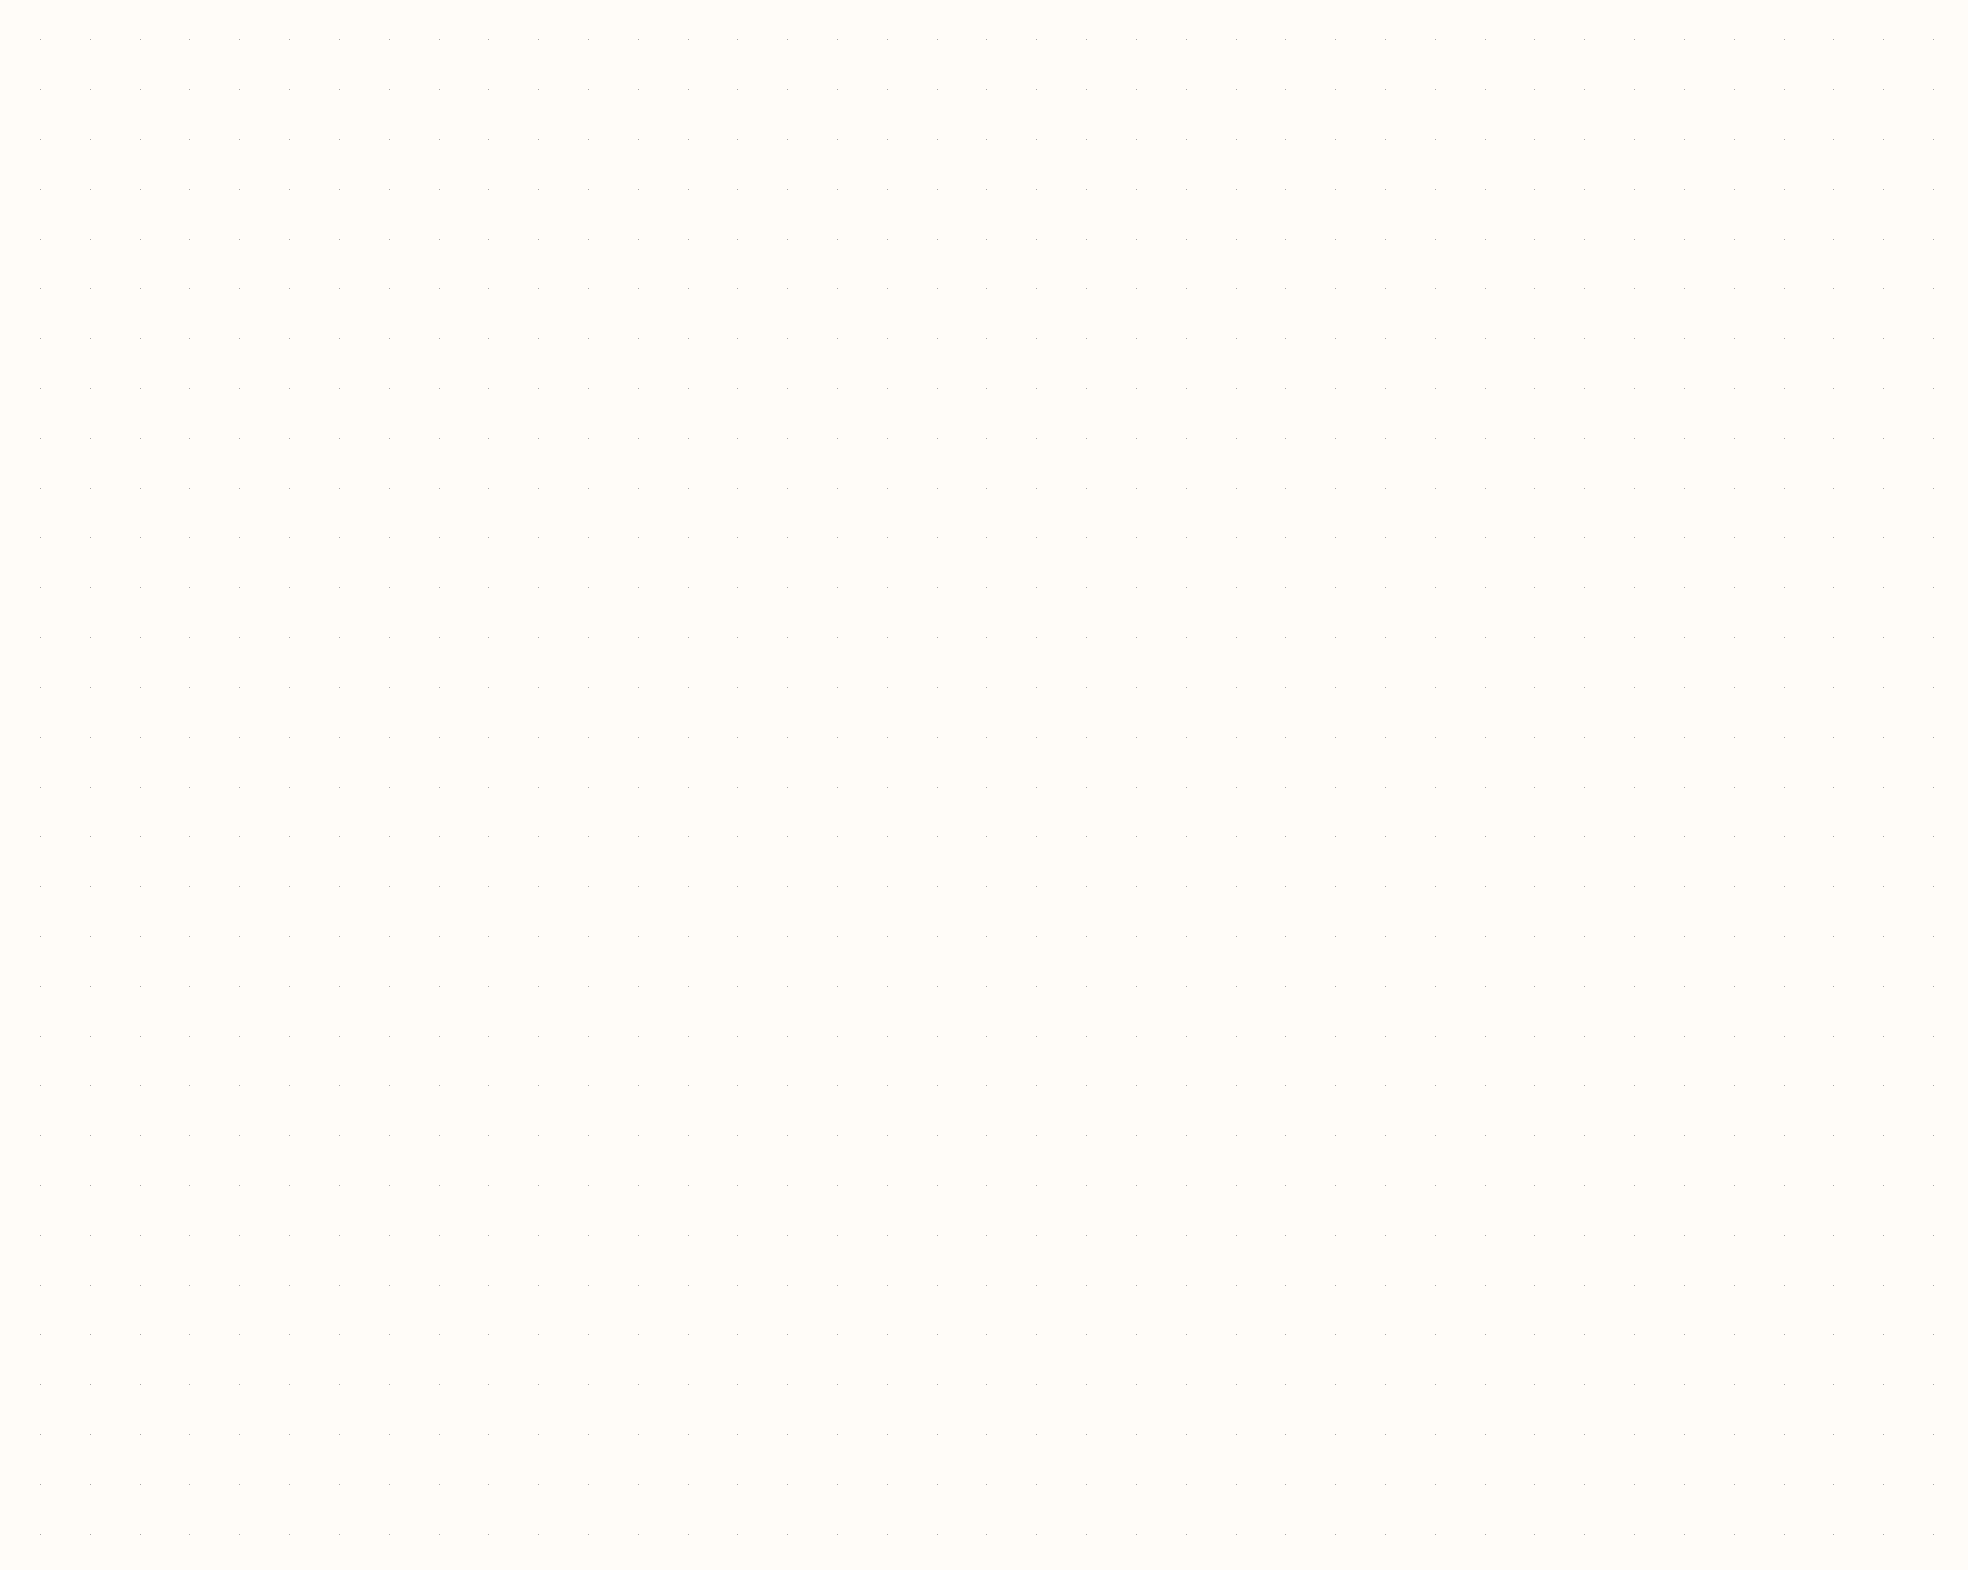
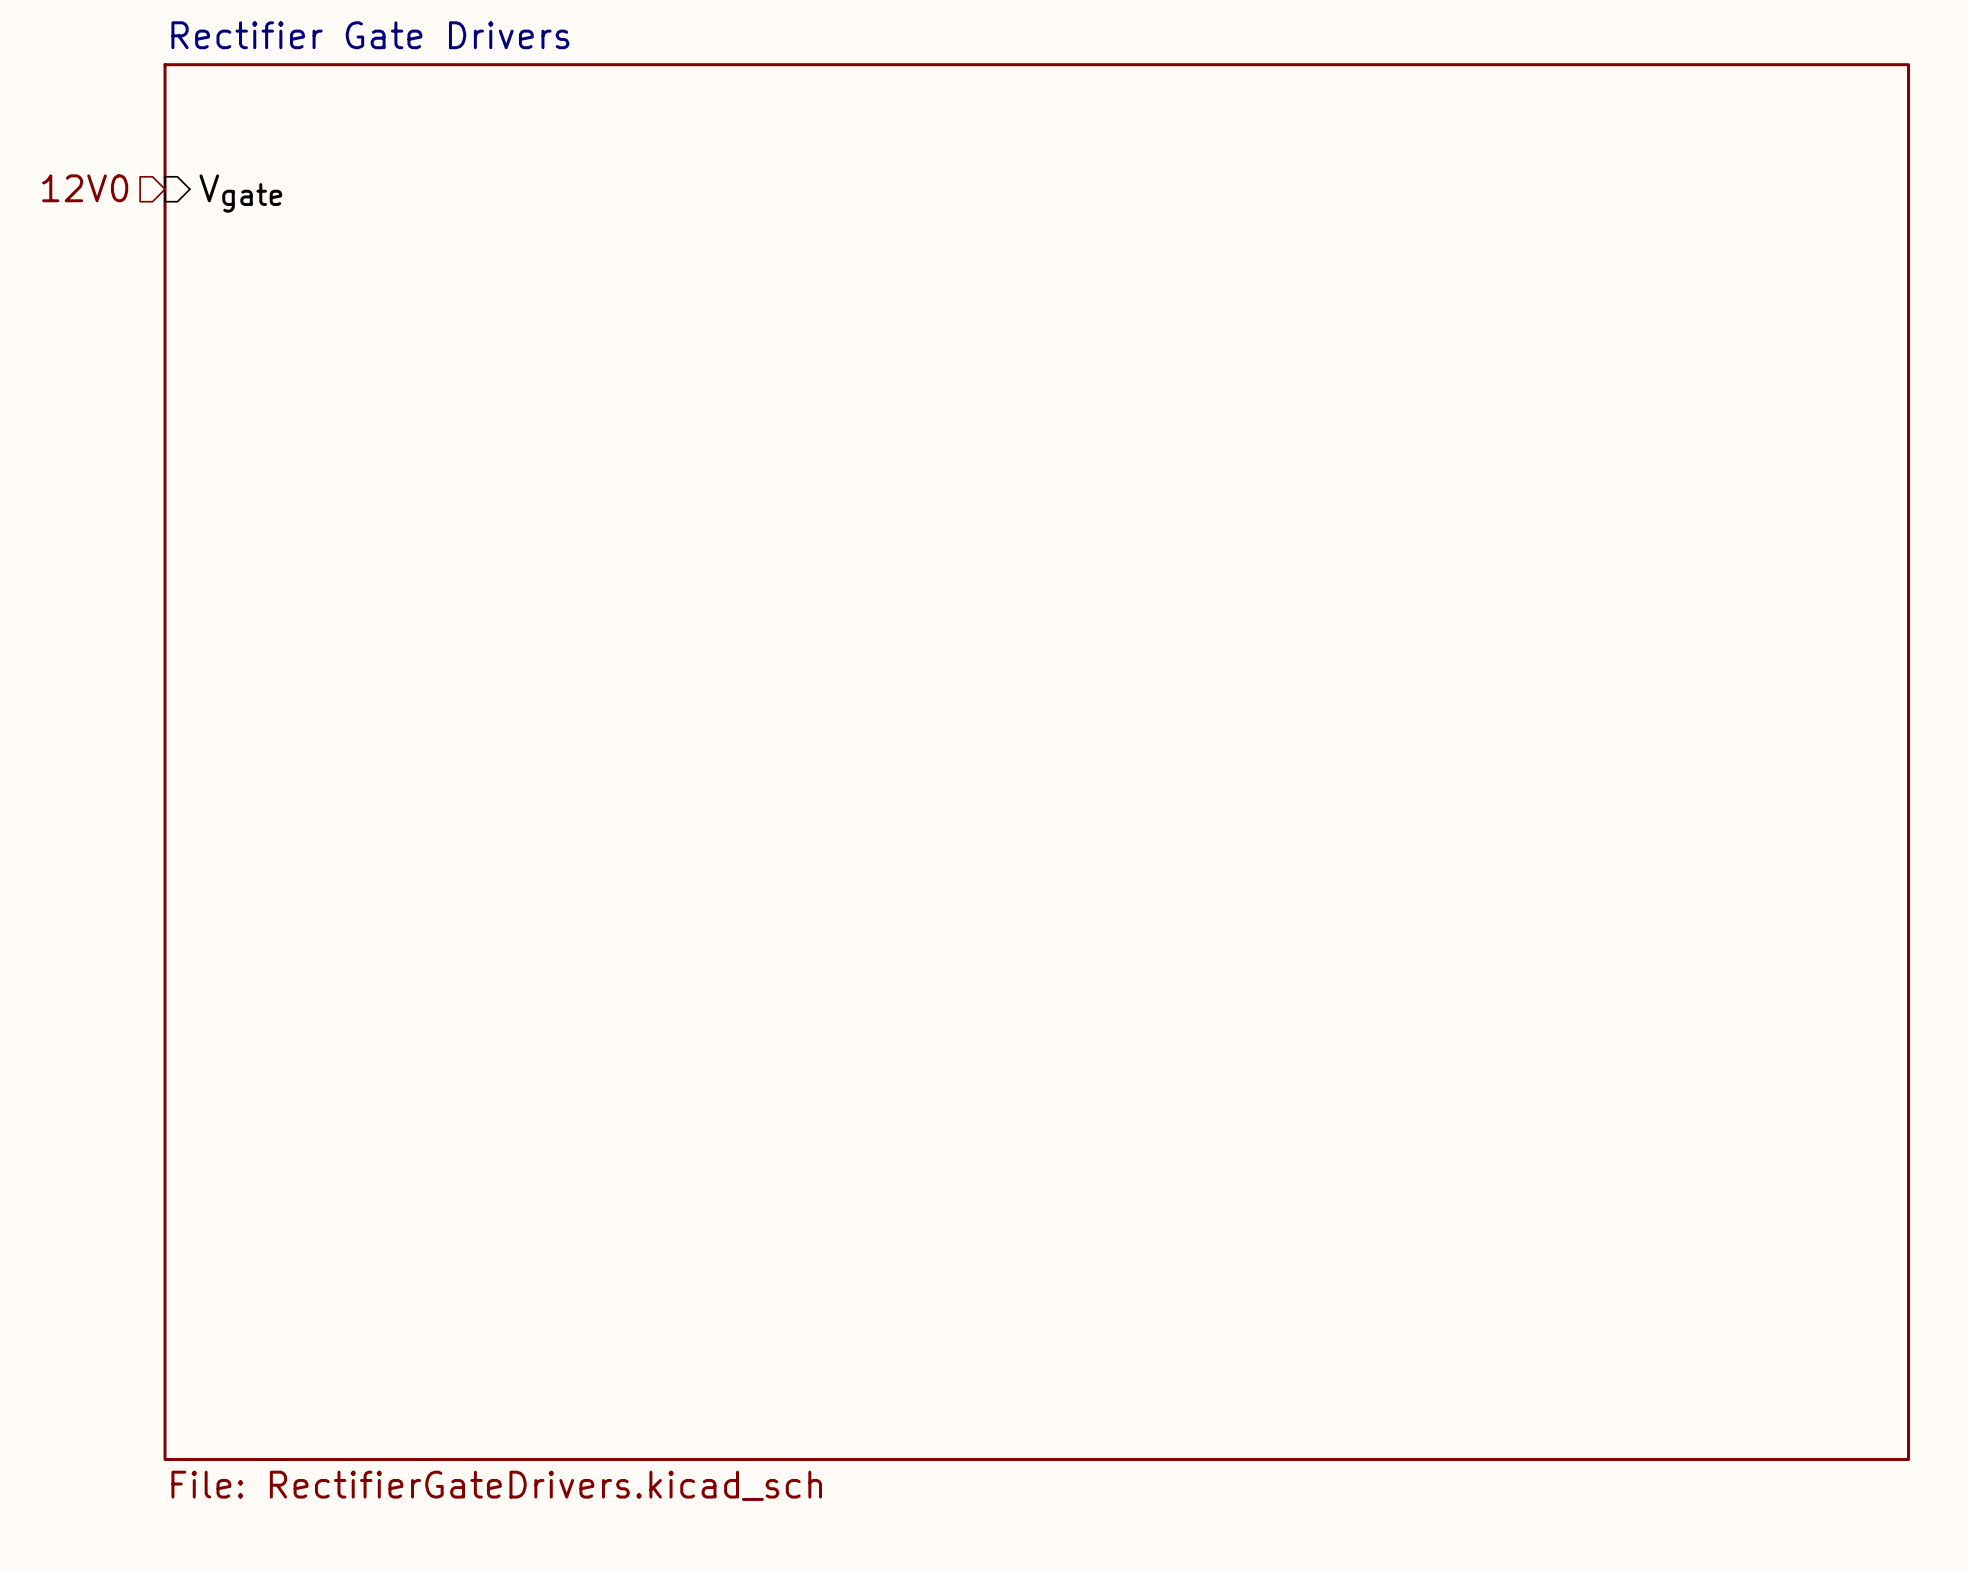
hierarchical label: none -> 12V0 (85, 188)
sheet pin: none -> Vgate (240, 193)
sheet Rectifier Gate Drivers: none -> File: RectifierGateDrivers.kicad_sch (1036, 762)

